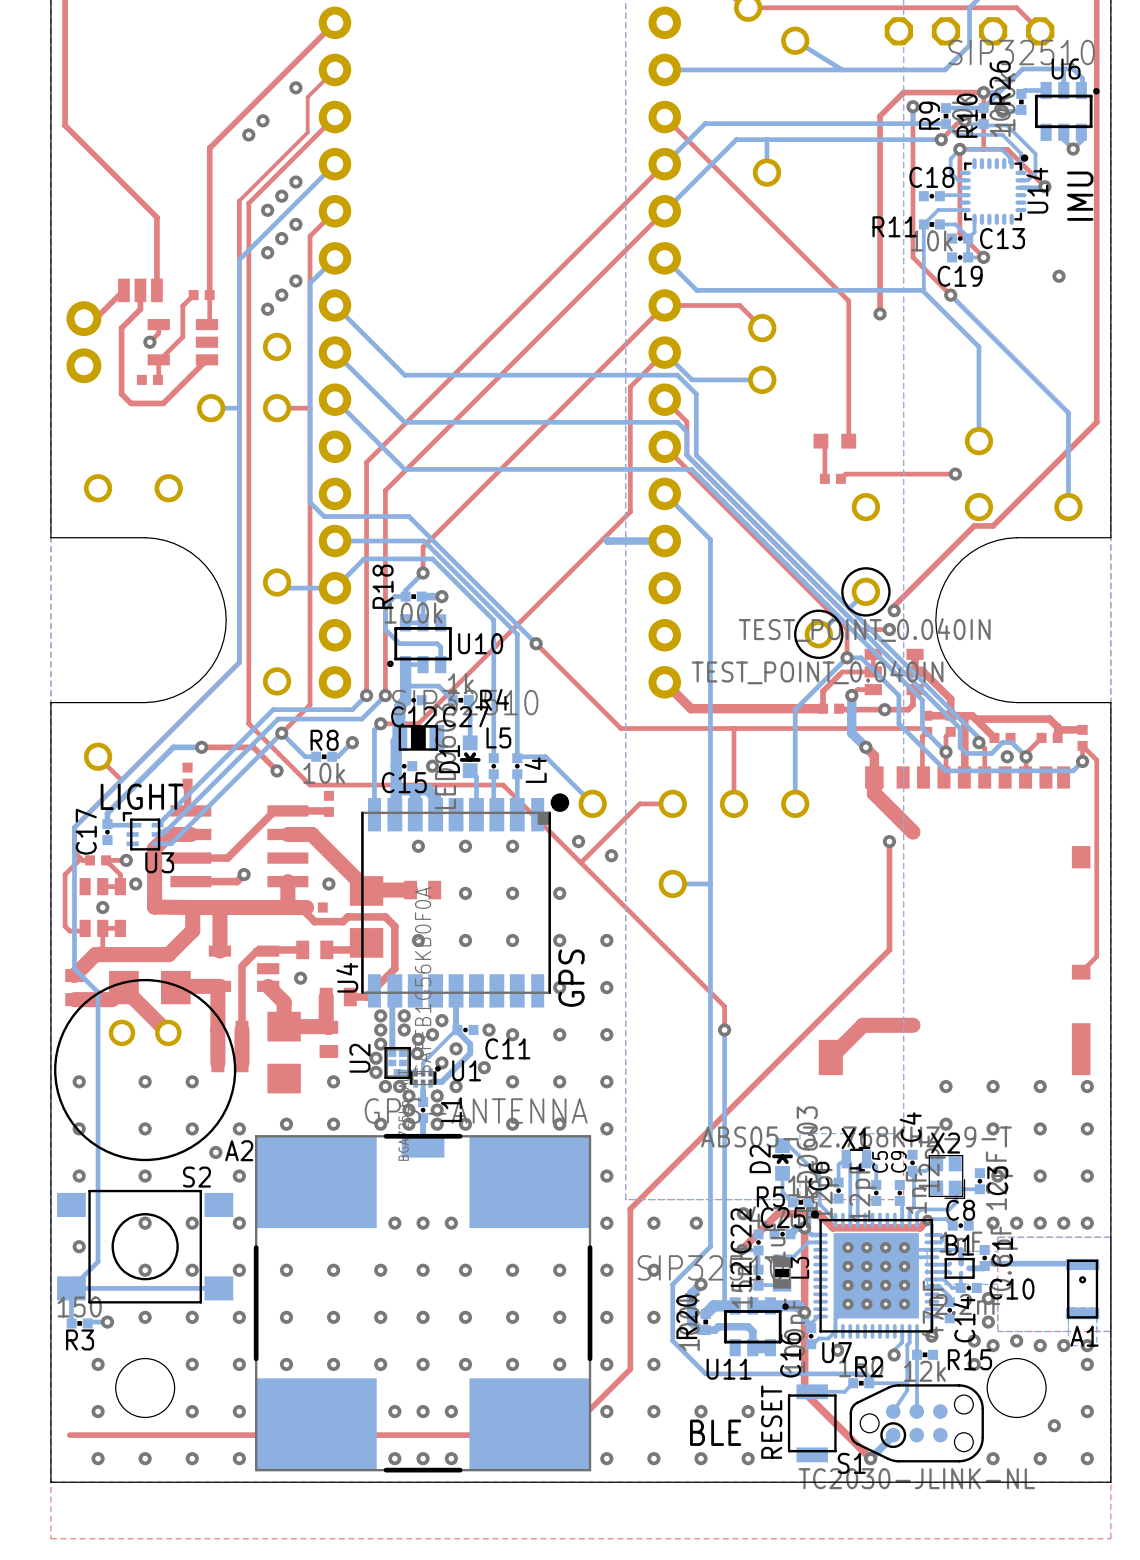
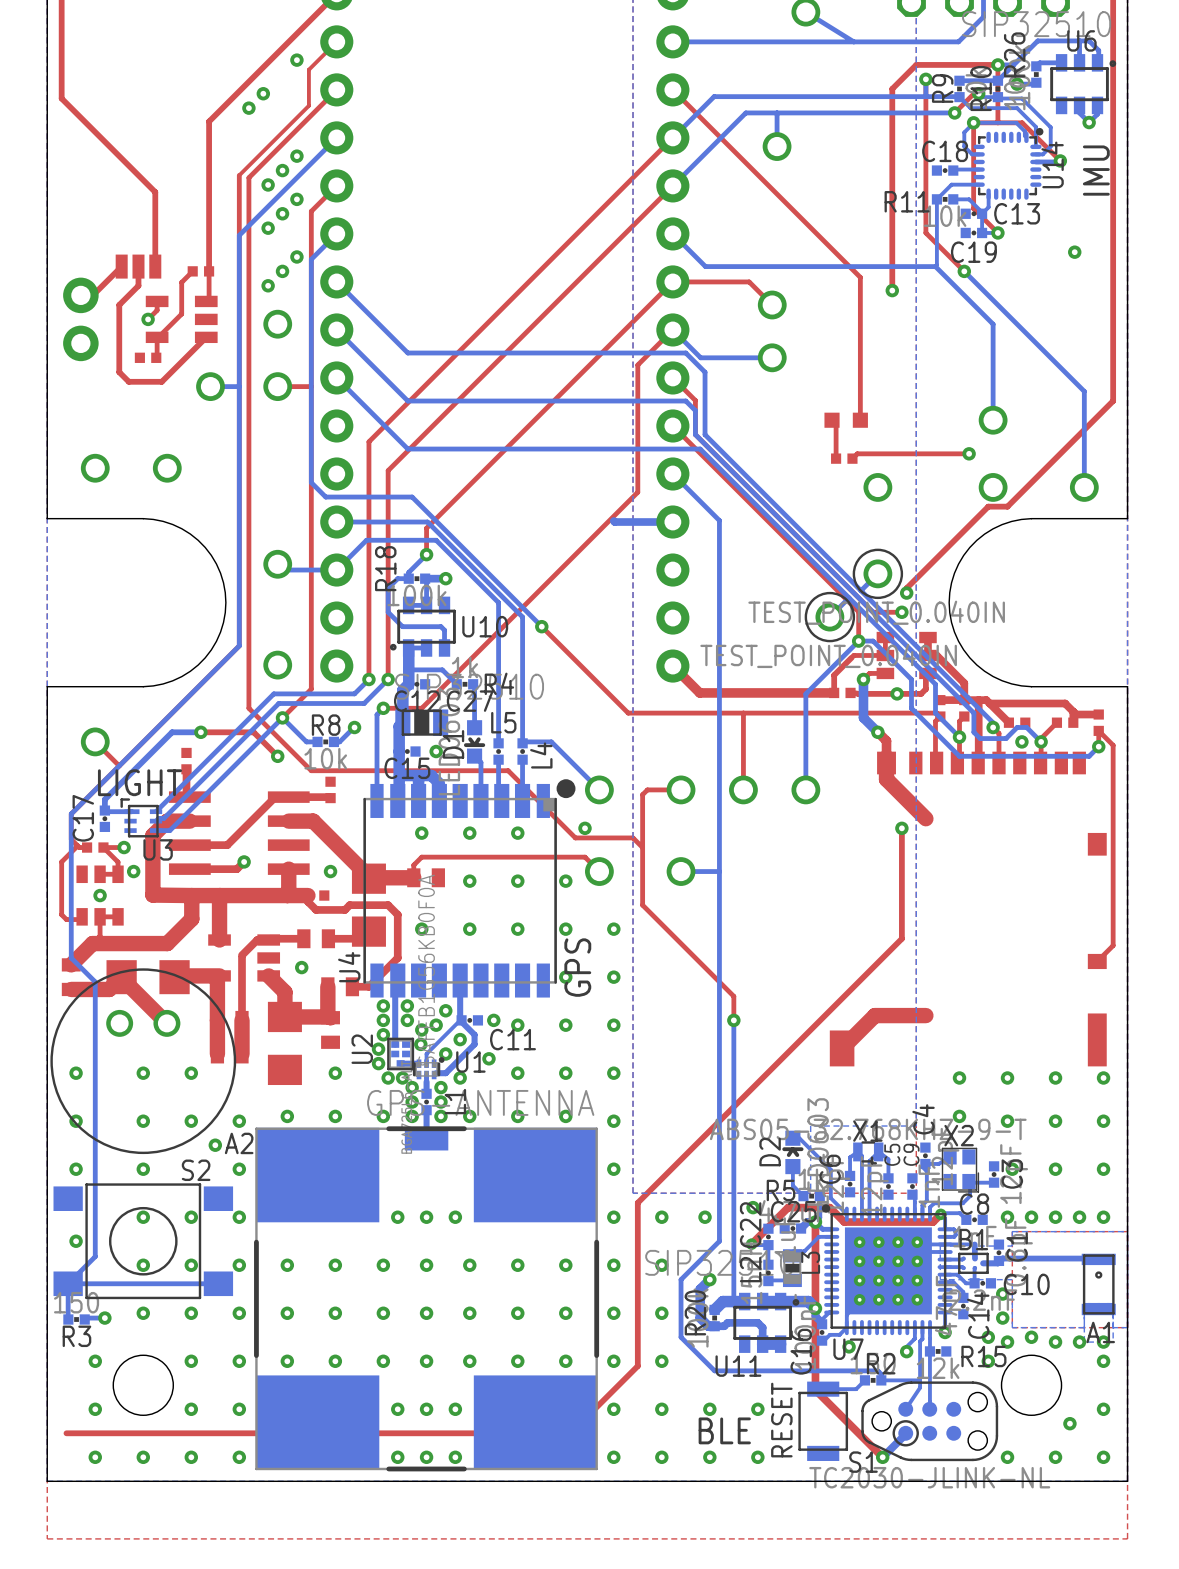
top track: (635, 808) (580, 862) -> (642, 794) (642, 905)
top track: (569, 850) (635, 916) -> (575, 837) (633, 837) (642, 847)
via: (611, 855) -> none
top track: none -> (599, 871) (585, 857) (421, 857) (413, 865) (413, 877)
part: none -> (599, 871)

